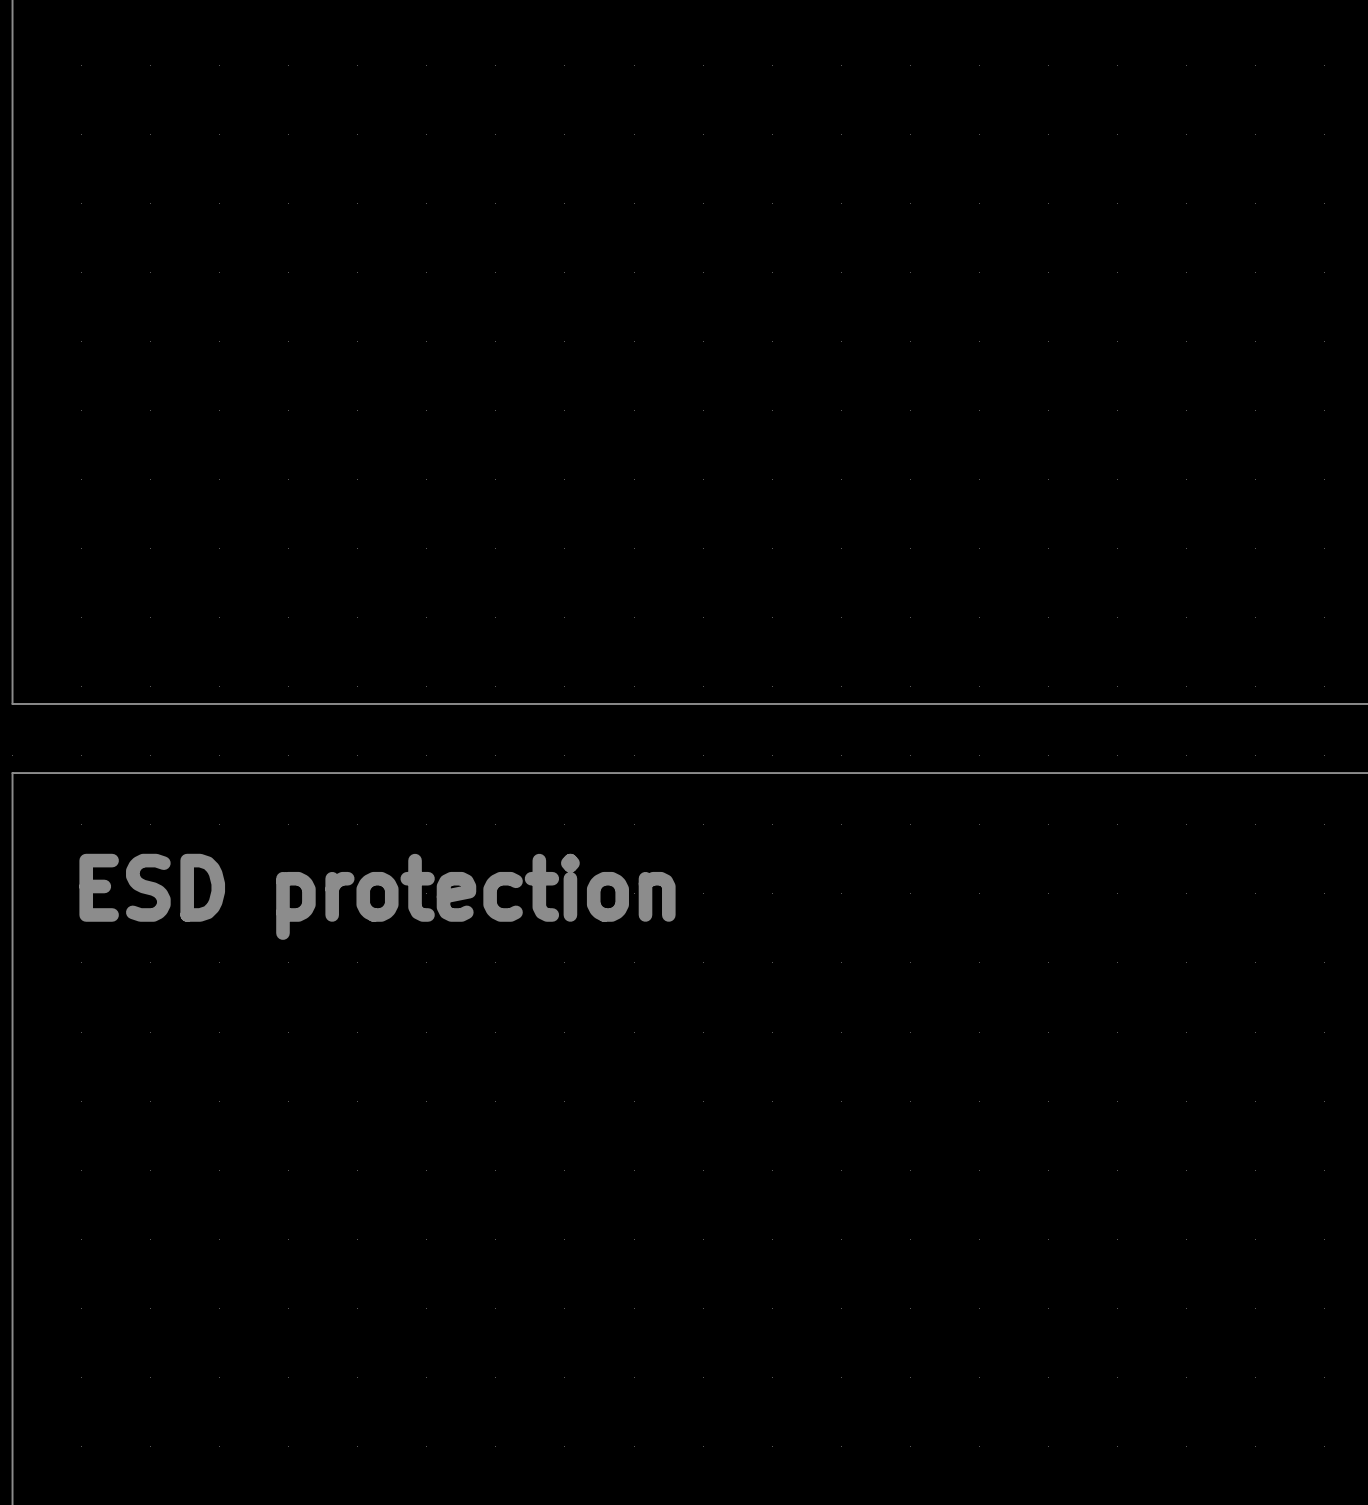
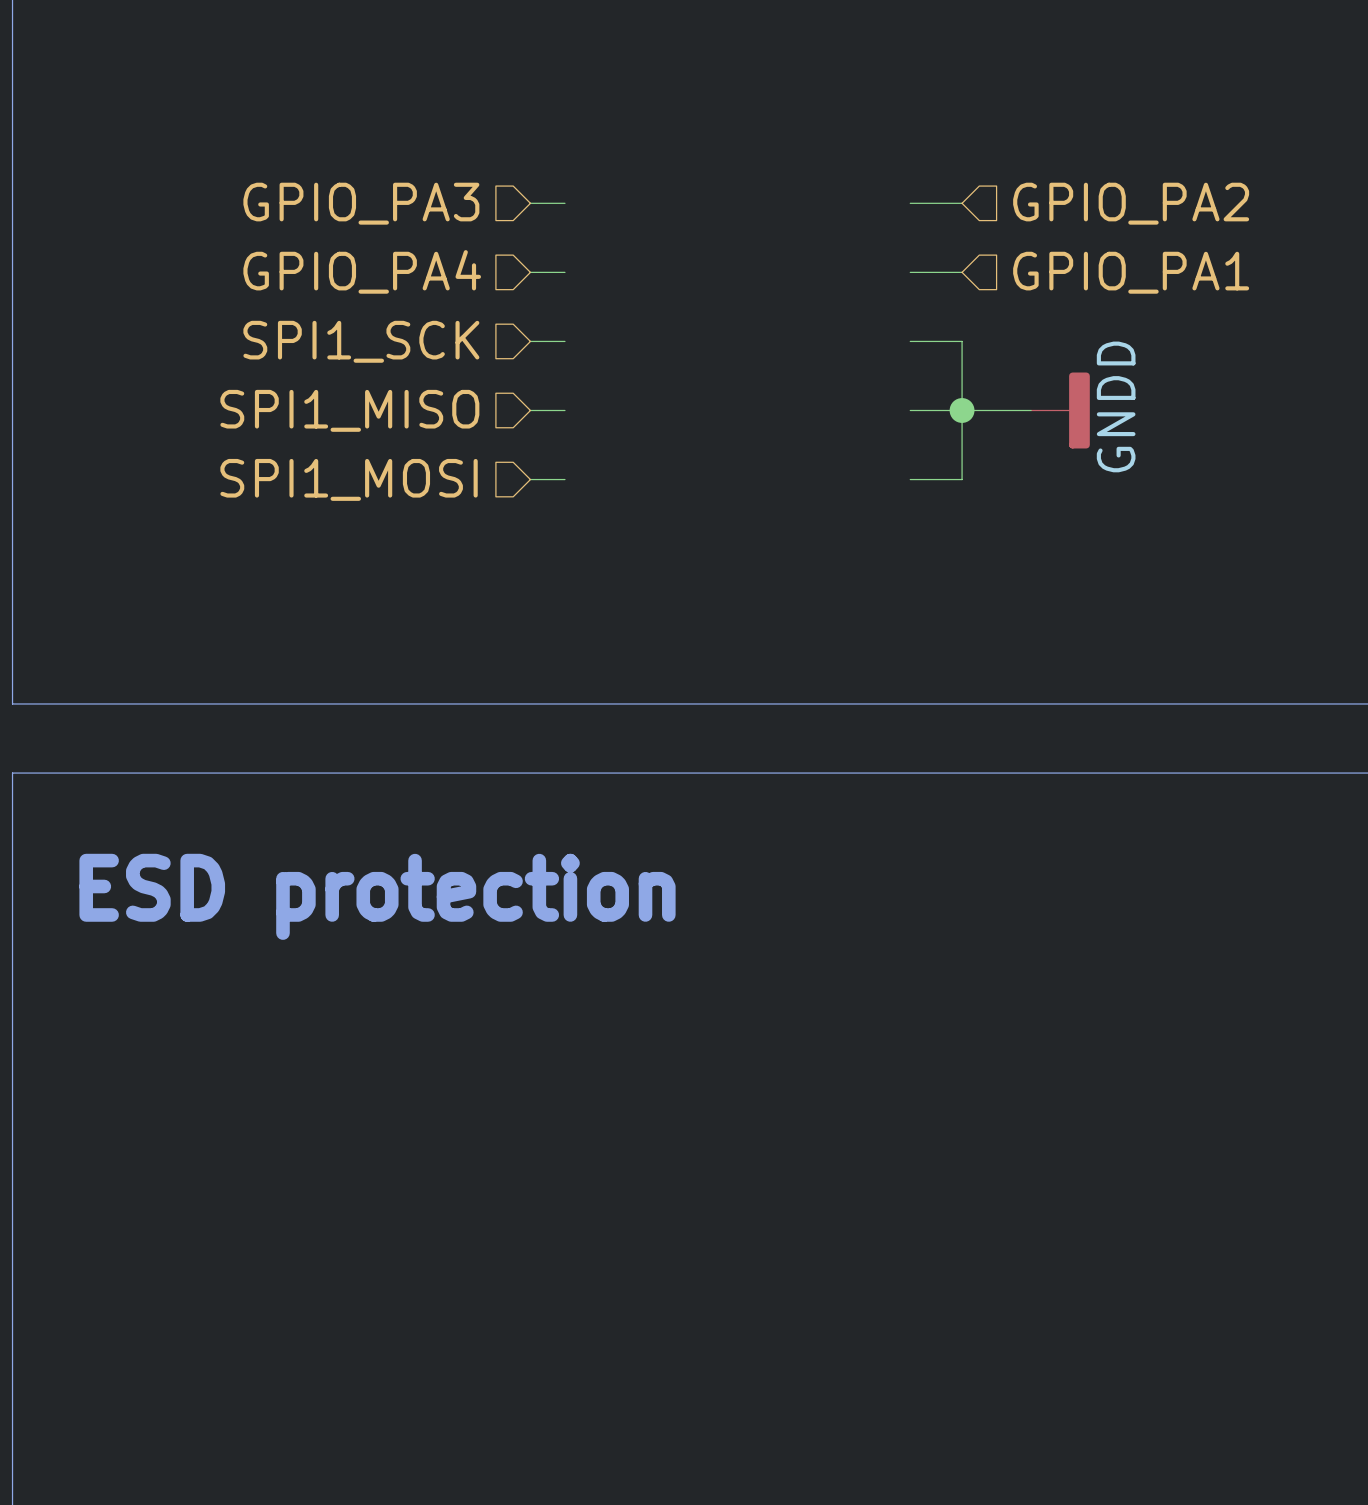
hierarchical label: none -> GPIO_PA3 (361, 203)
wire: none -> (530, 203) (564, 203)
wire: none -> (910, 203) (962, 203)
hierarchical label: none -> GPIO_PA2 (1131, 203)
hierarchical label: none -> GPIO_PA4 (362, 271)
wire: none -> (530, 272) (564, 272)
wire: none -> (910, 272) (962, 272)
hierarchical label: none -> GPIO_PA1 (1131, 272)
hierarchical label: none -> SPI1_SCK (361, 341)
wire: none -> (530, 341) (564, 341)
wire: none -> (910, 341) (962, 341) (962, 479) (910, 479)
hierarchical label: none -> SPI1_MISO (349, 410)
wire: none -> (530, 410) (564, 410)
wire: none -> (910, 410) (1031, 410)
junction: none -> (962, 410)
power symbol: none -> GNDD (1060, 410)
hierarchical label: none -> SPI1_MOSI (349, 479)
wire: none -> (530, 479) (564, 479)

